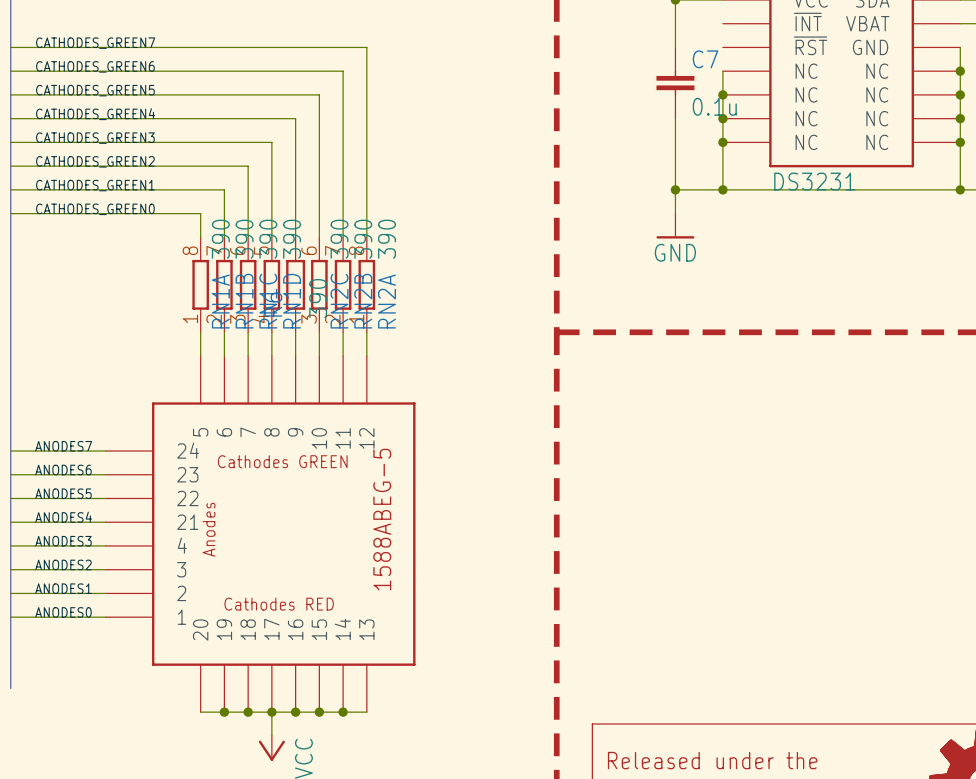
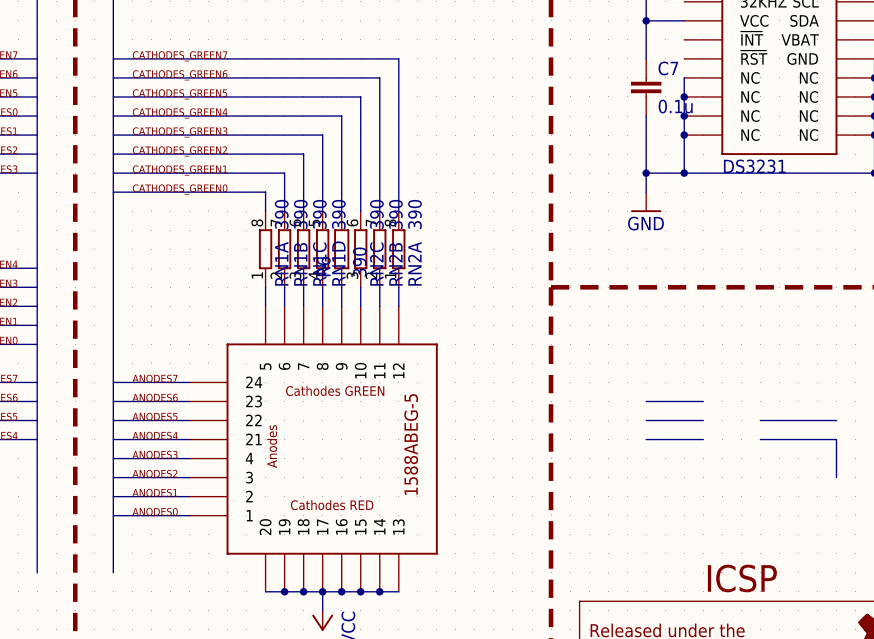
wire: none -> (646, 401) (703, 401)
wire: none -> (646, 420) (703, 420)
wire: none -> (760, 420) (836, 420)
wire: none -> (646, 439) (703, 439)
wire: none -> (760, 439) (836, 439) (836, 477)
text: none -> ICSP (742, 578)

